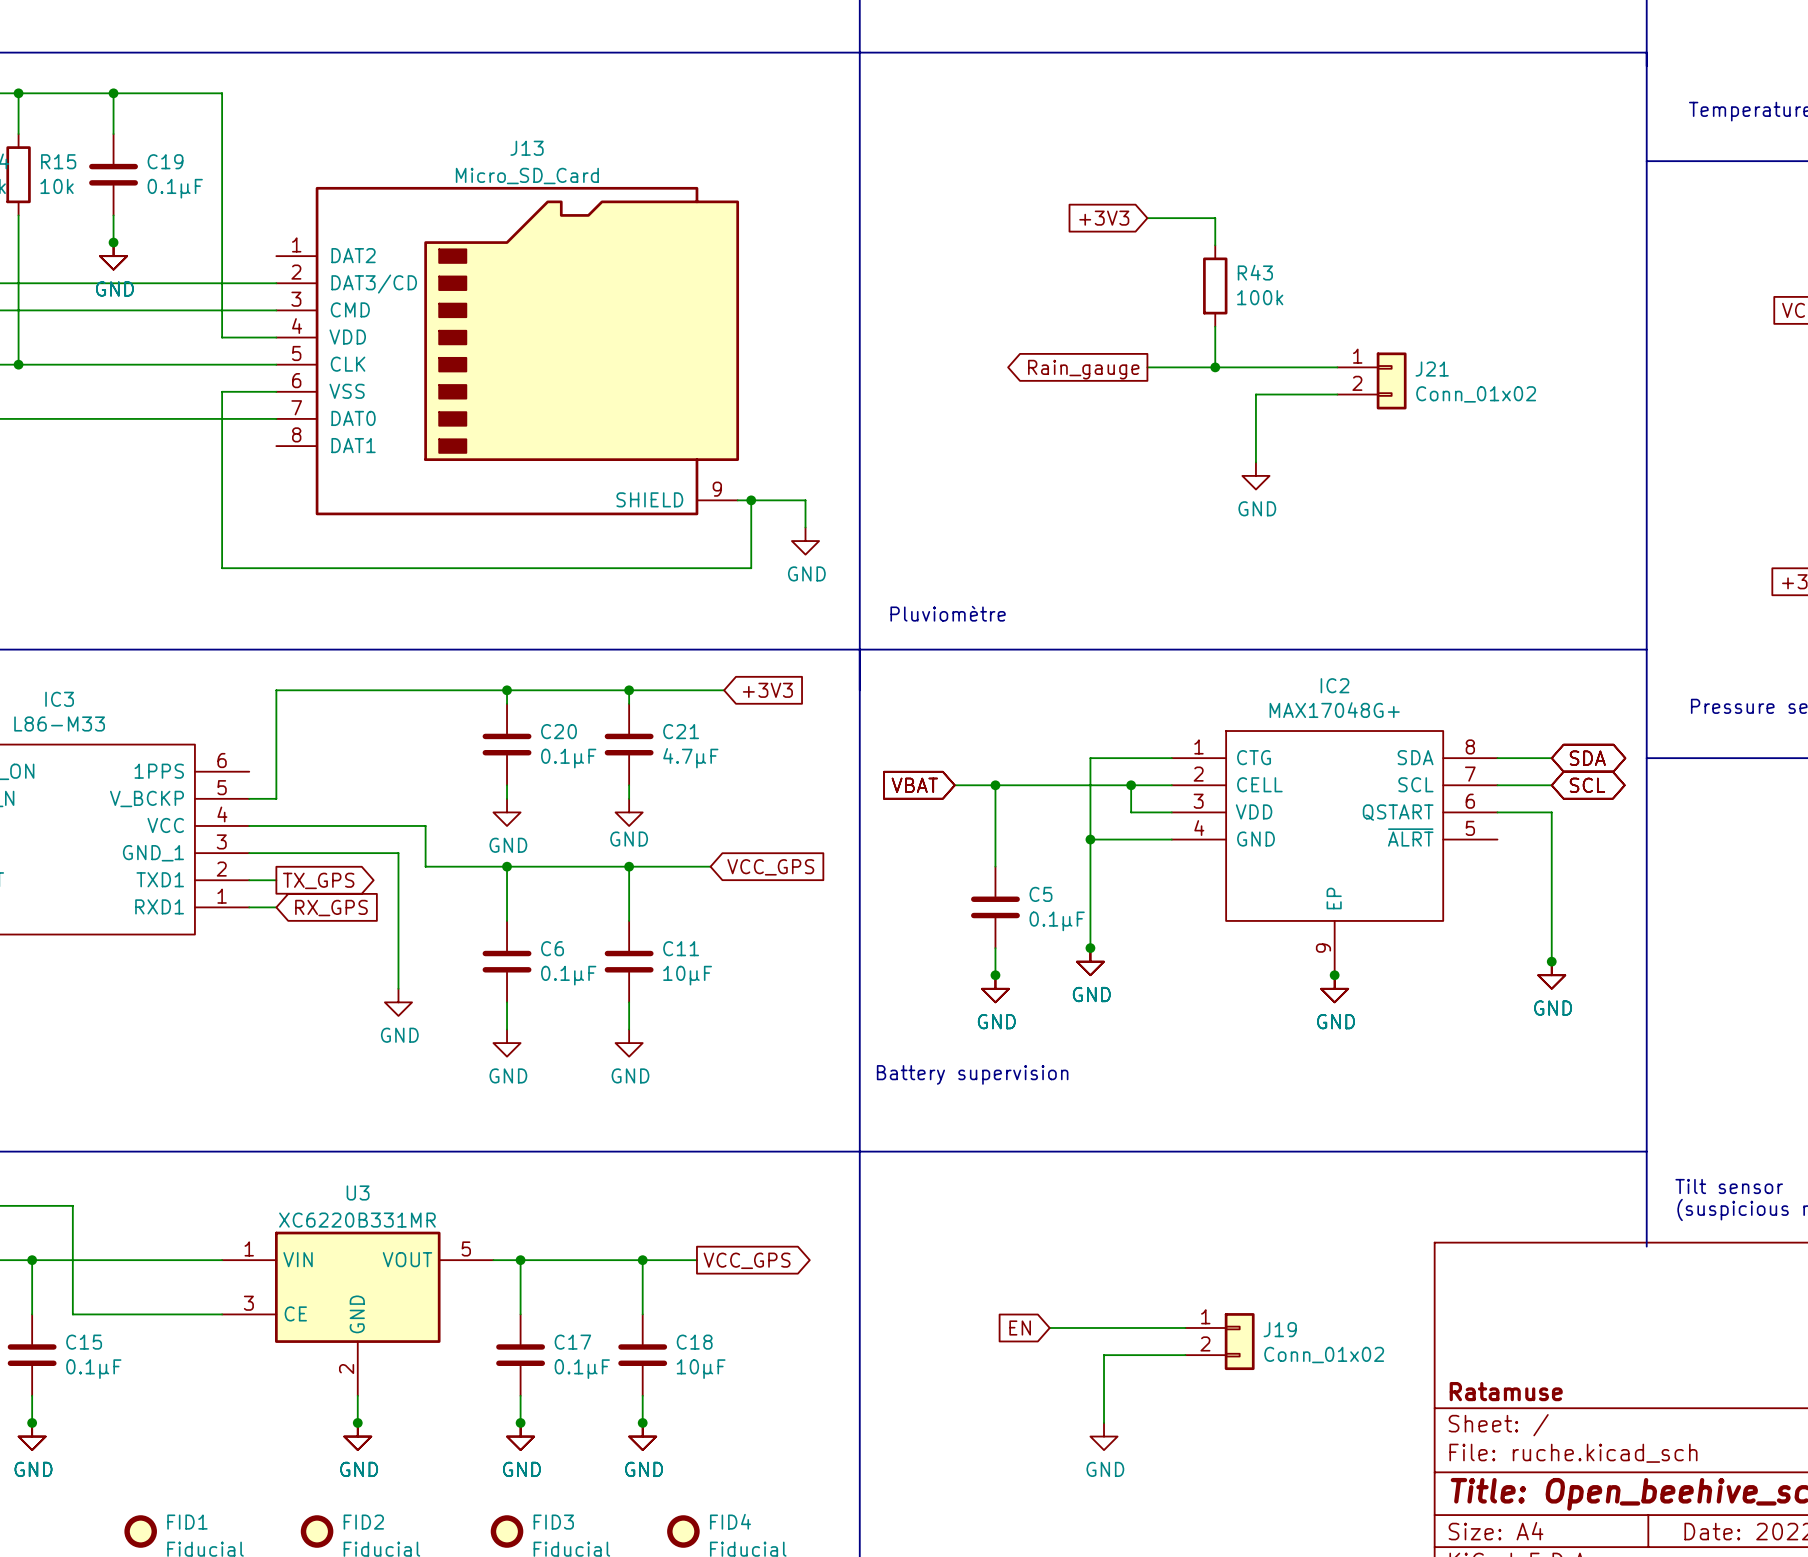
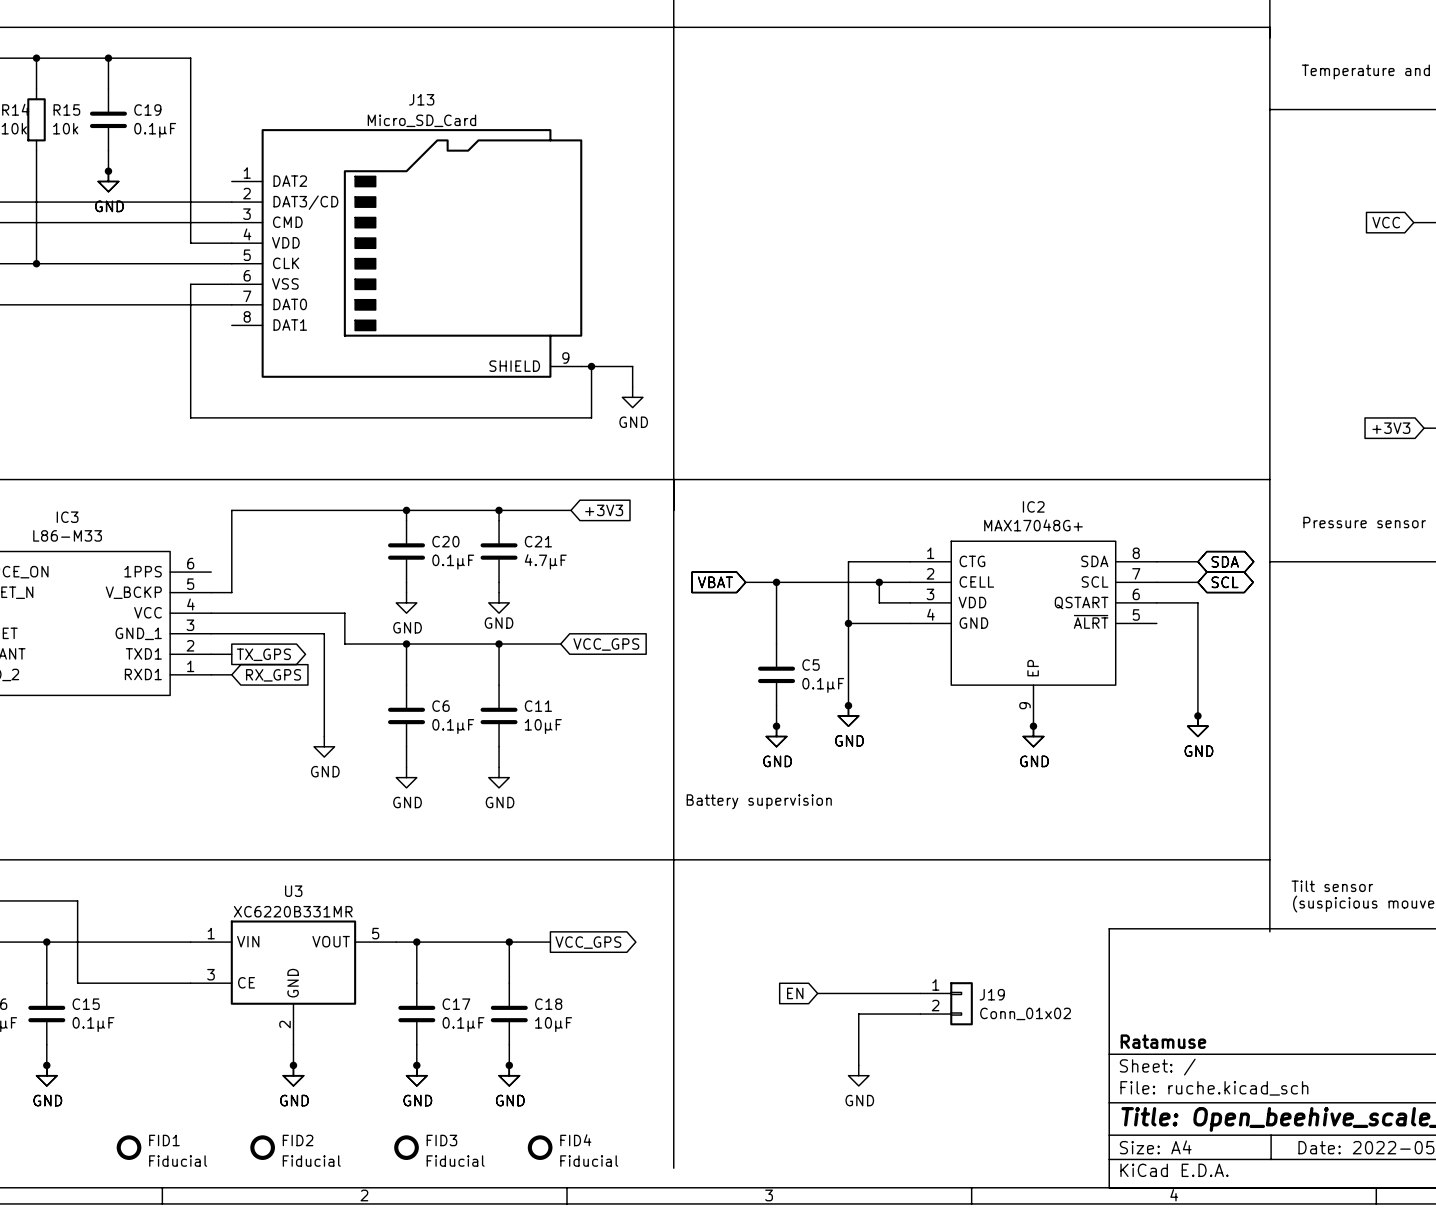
global label: +3V3 (1104, 218) -> none
wire: (1147, 218) (1215, 218) (1215, 245) -> none
R43: 100k (1215, 285) -> none
wire: (1215, 326) (1215, 367) -> none
wire: (1147, 367) (1337, 367) -> none
junction: (1215, 367) -> none
global label: Rain_gauge (1083, 369) -> none
J21: Conn_01x02 (1371, 380) -> none
wire: (1337, 394) (1255, 394) (1255, 462) -> none
power symbol: GND (1255, 475) -> none
text: Pluviomètre (948, 613) -> none

